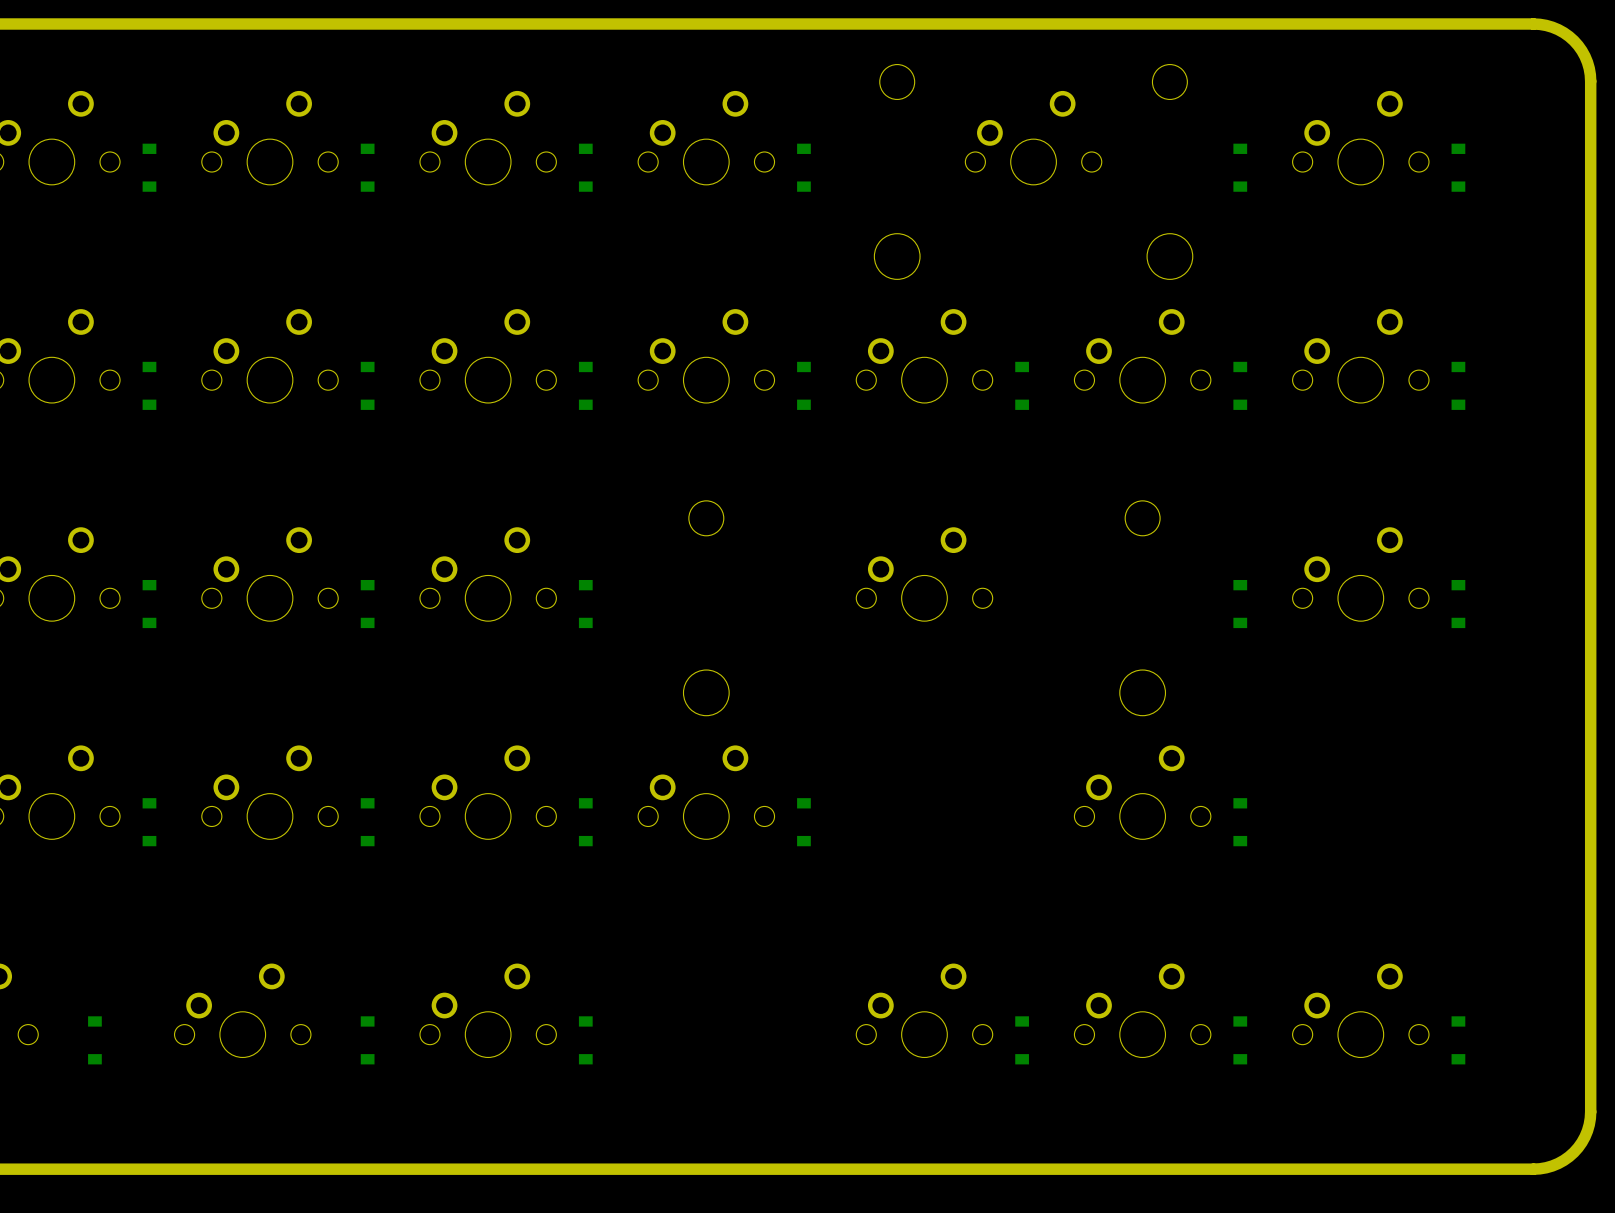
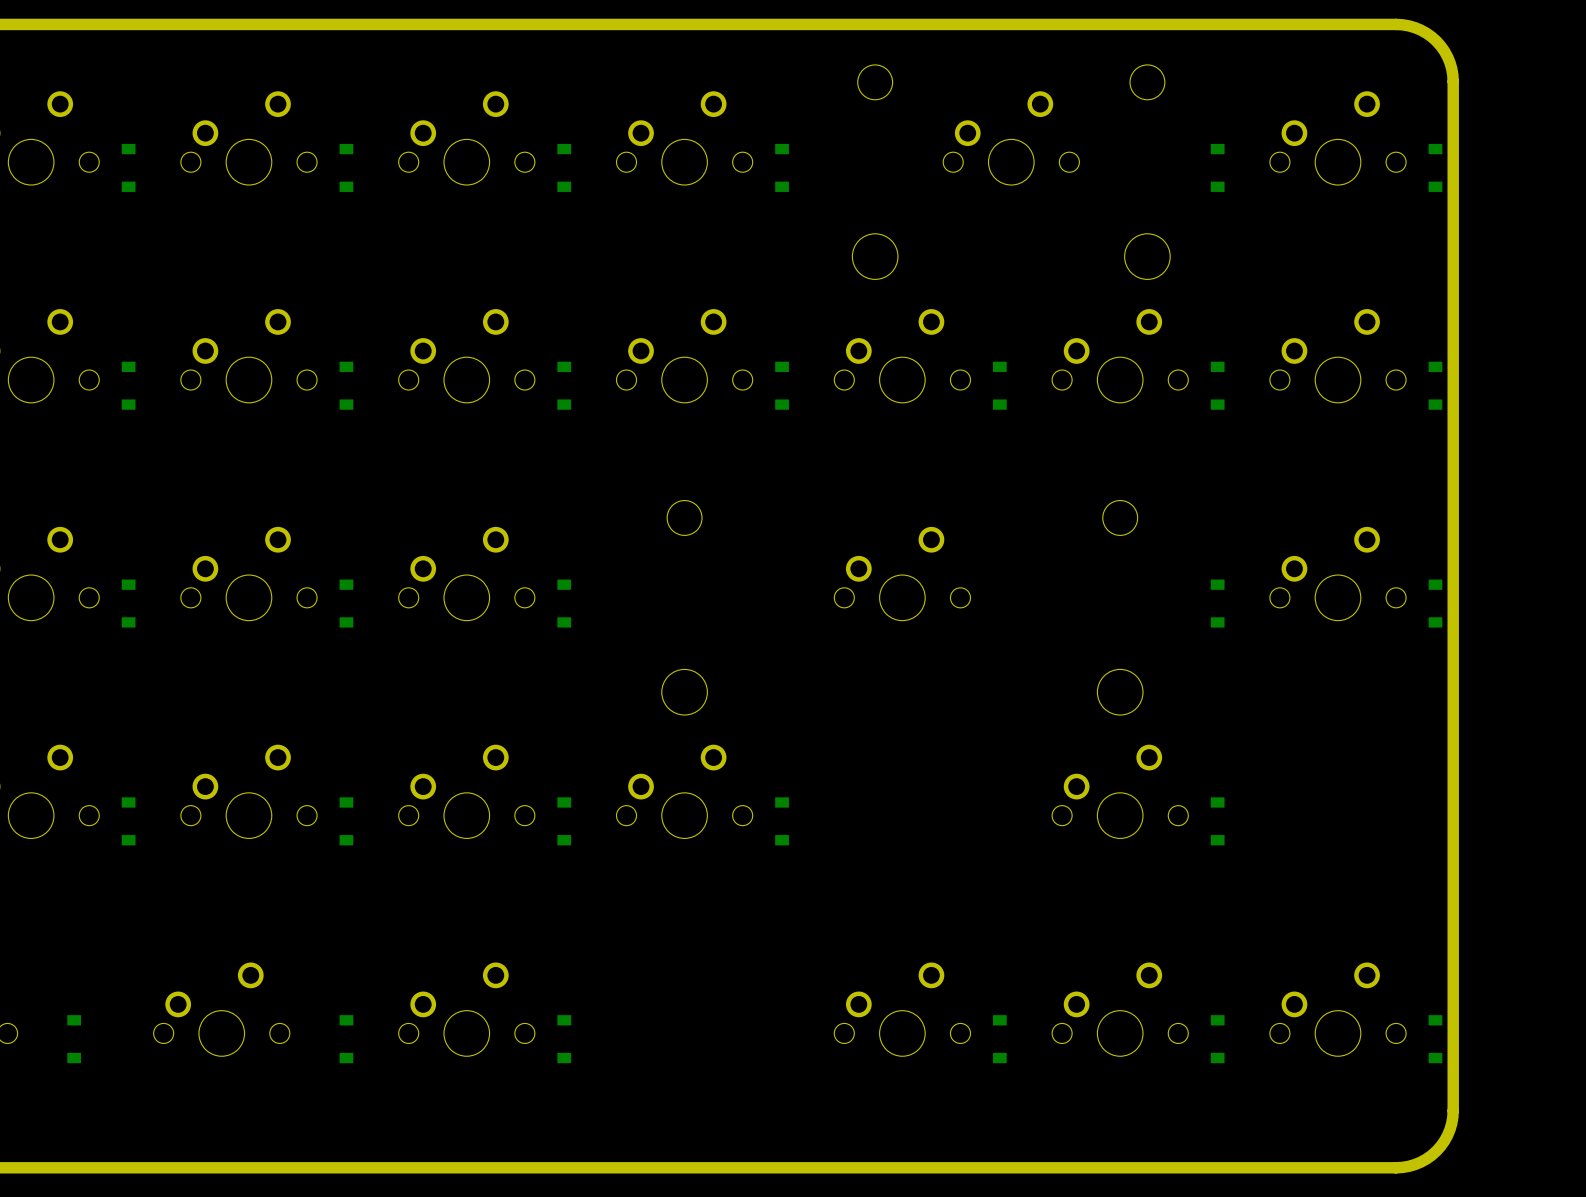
board edge: (1418, 24) (1533, 24) (1552, 27) (1563, 32) (1578, 45) (1587, 62) (1590, 81) (1590, 1118) (1587, 1130) (1578, 1147) (1563, 1160) (1552, 1165) (1533, 1169) (1418, 1169) -> (1396, 24) (1420, 30) (1436, 41) (1447, 56) (1453, 81) (1453, 1110) (1449, 1129) (1436, 1151) (1414, 1164) (1396, 1167)

